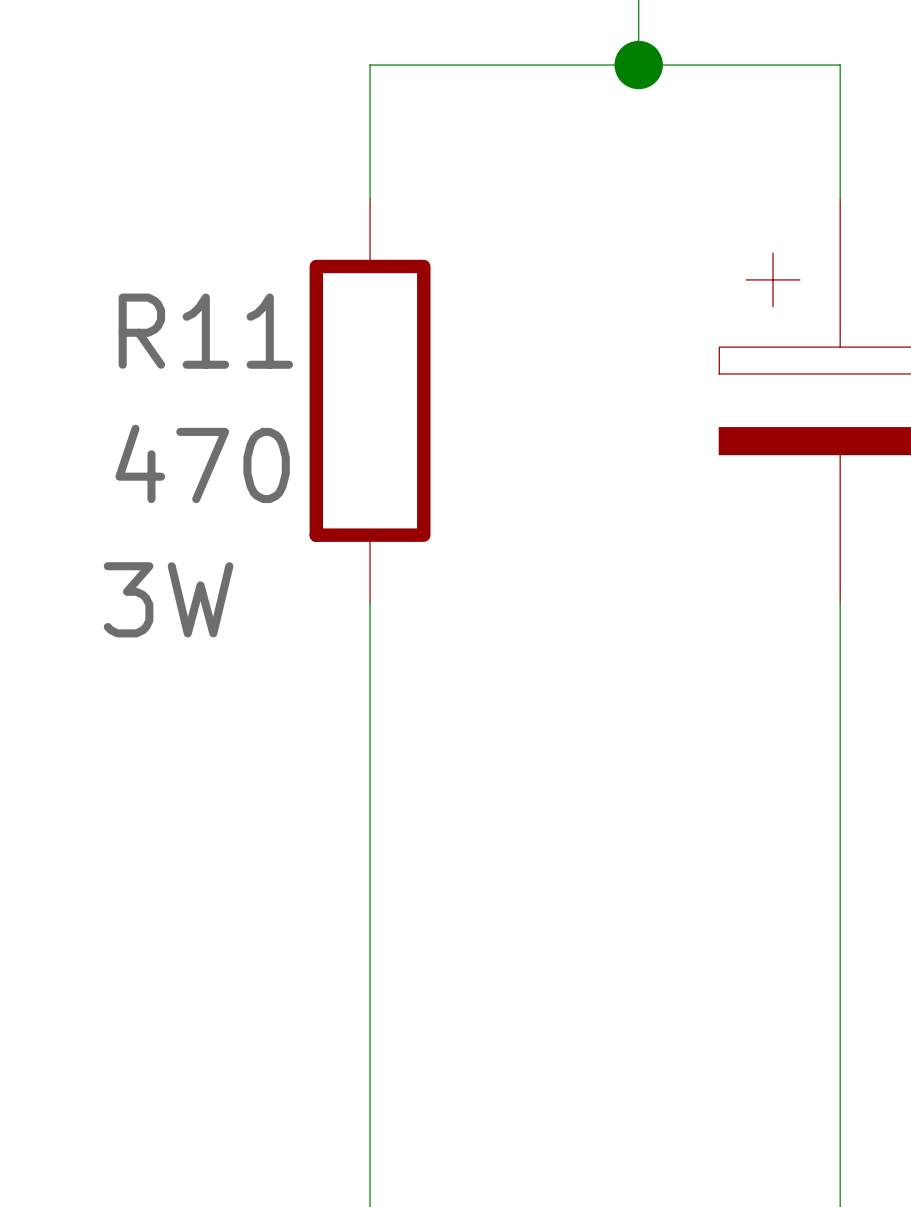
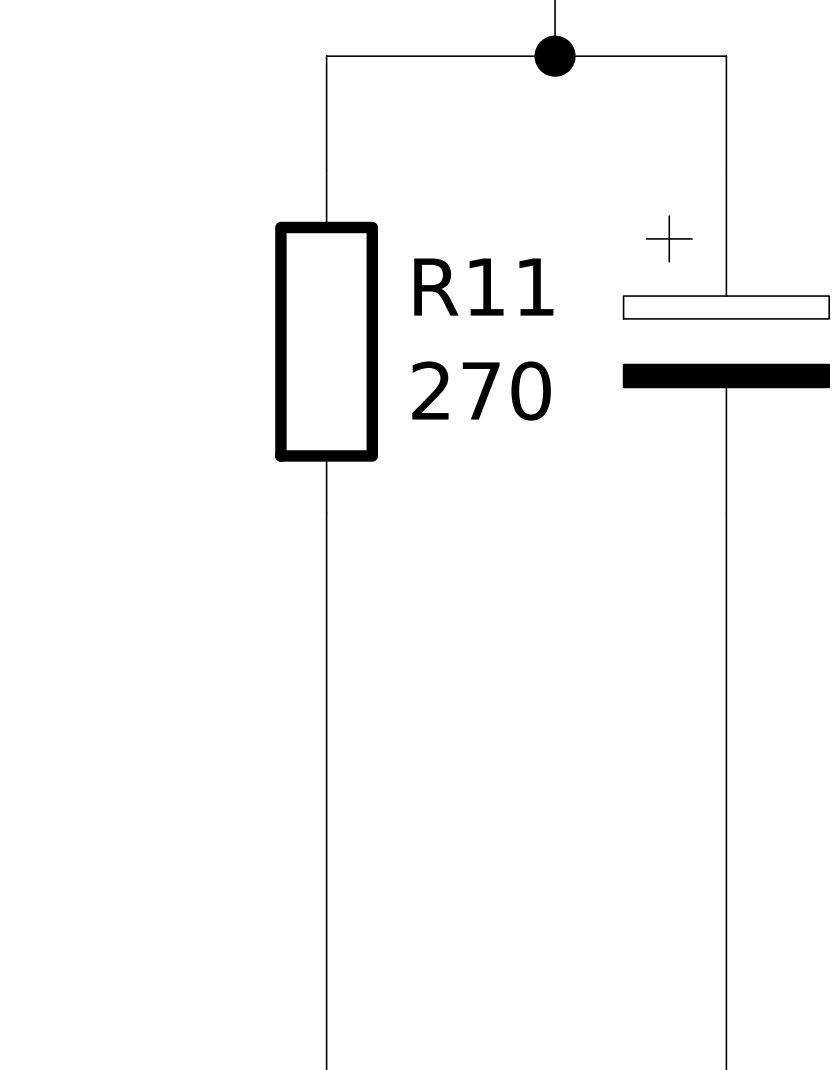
R11 name position: R11 (205, 331) -> R11 (483, 287)
R11 value: 470 (202, 463) -> 270 (481, 391)
R11 text: 3W (168, 599) -> none

